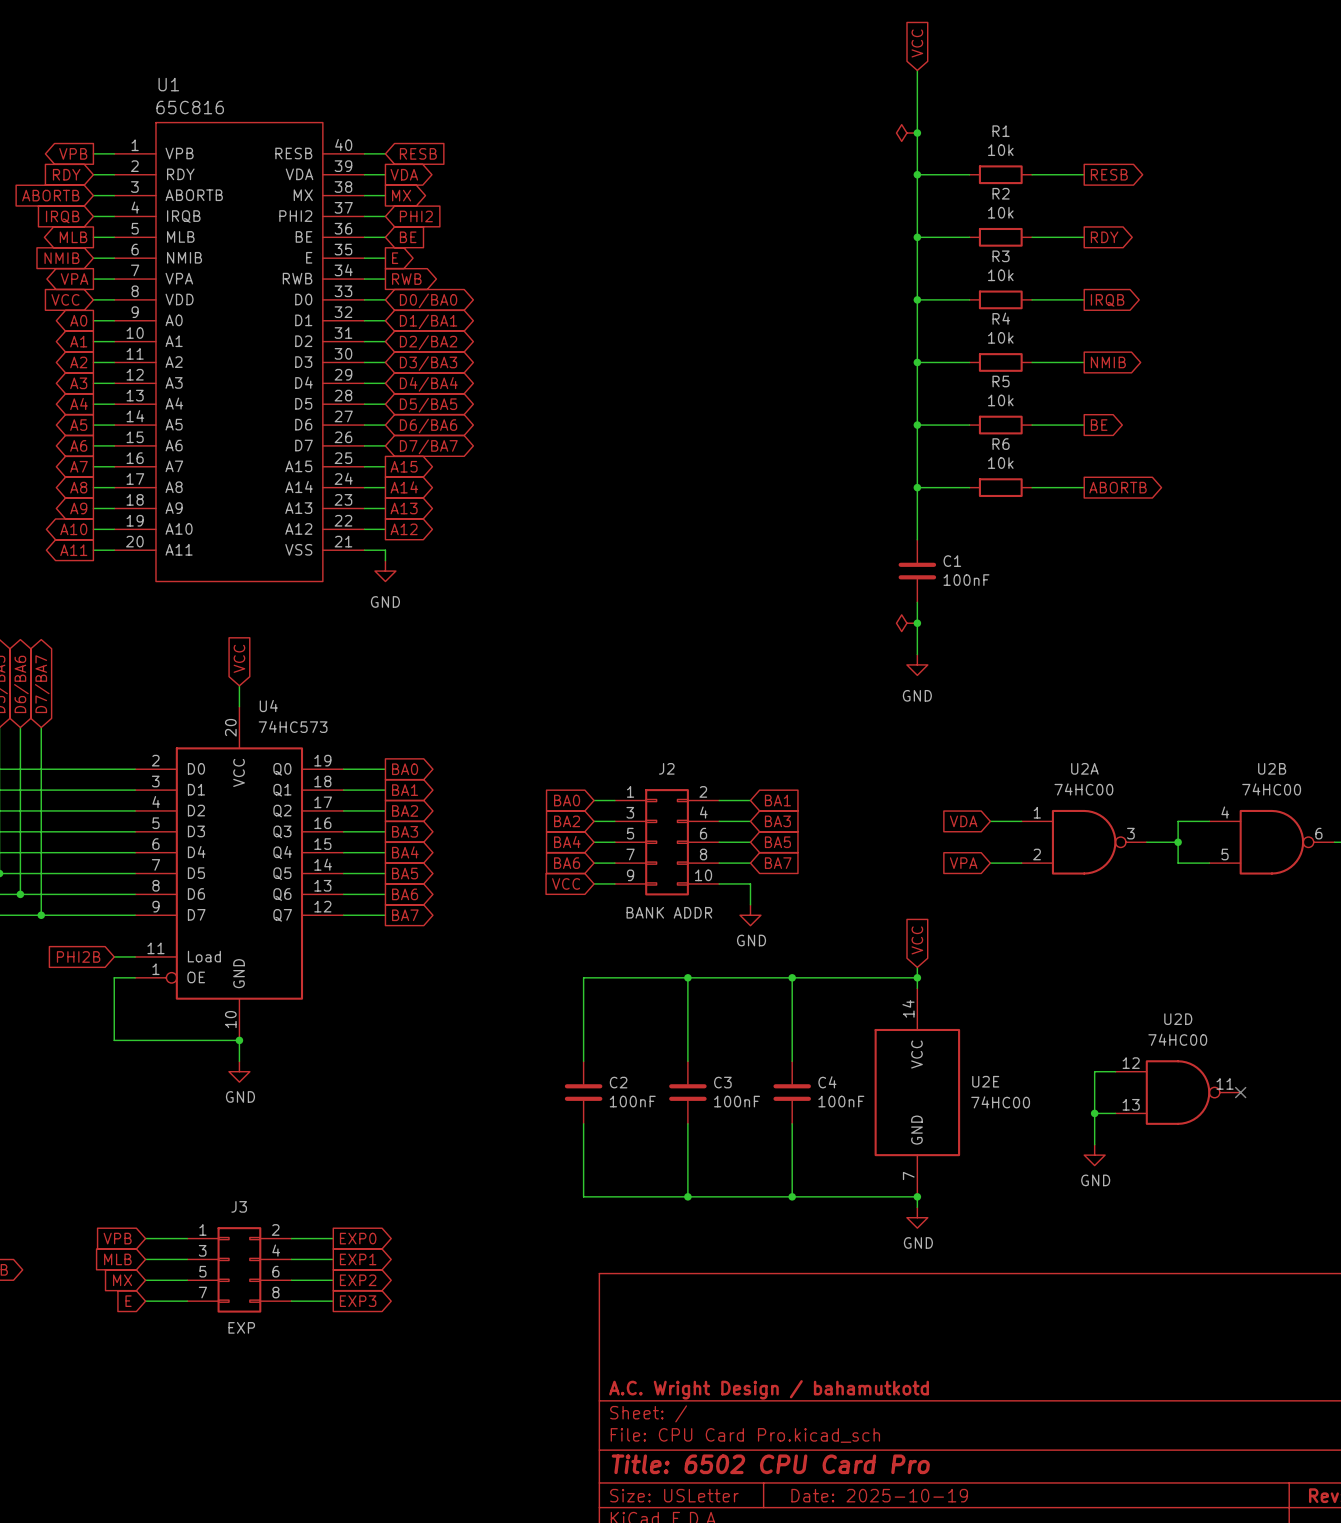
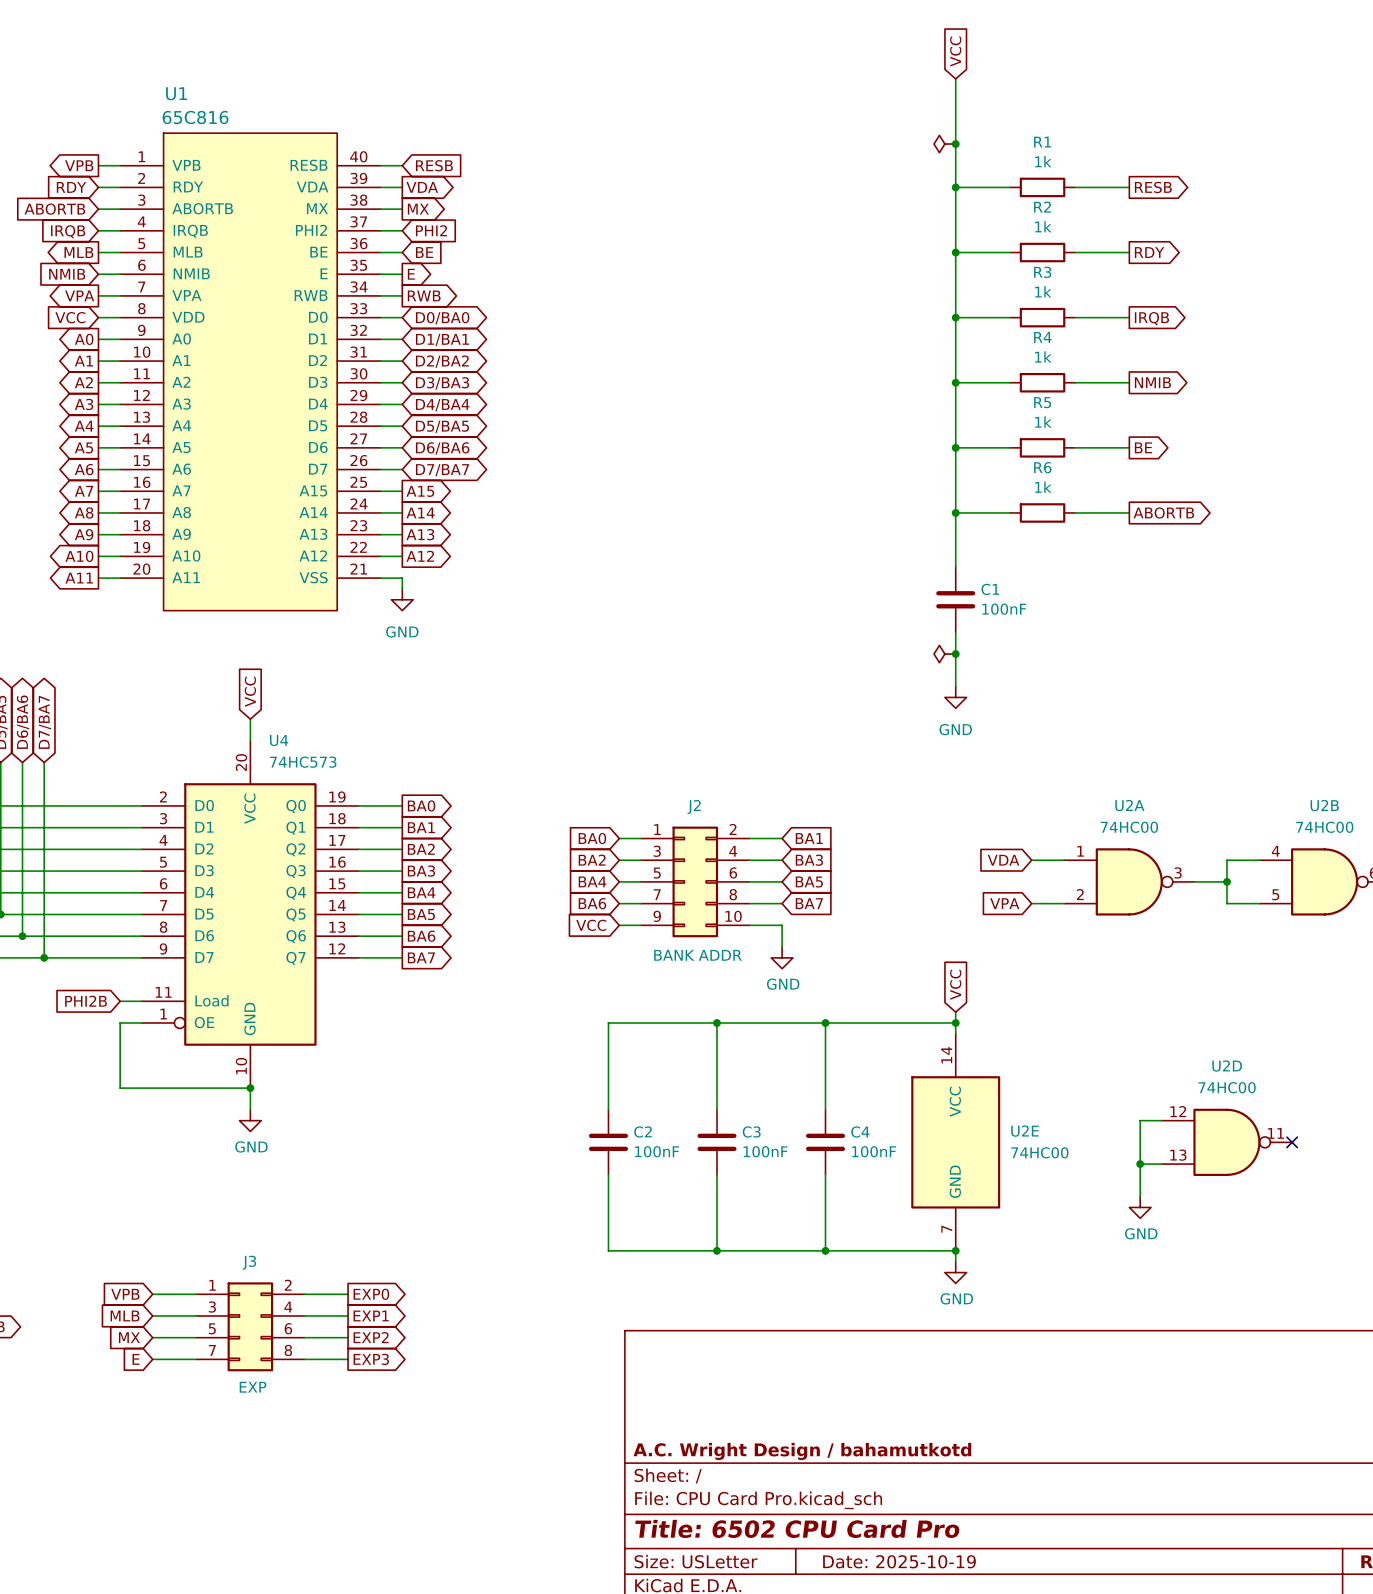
R1 value: 10k (1000, 150) -> 1k (1043, 161)
R2 value: 10k (1000, 212) -> 1k (1043, 226)
R3 value: 10k (1000, 275) -> 1k (1043, 291)
R4 value: 10k (1000, 337) -> 1k (1043, 356)
R5 value: 10k (1000, 400) -> 1k (1043, 422)
R6 value: 10k (1000, 463) -> 1k (1043, 487)

